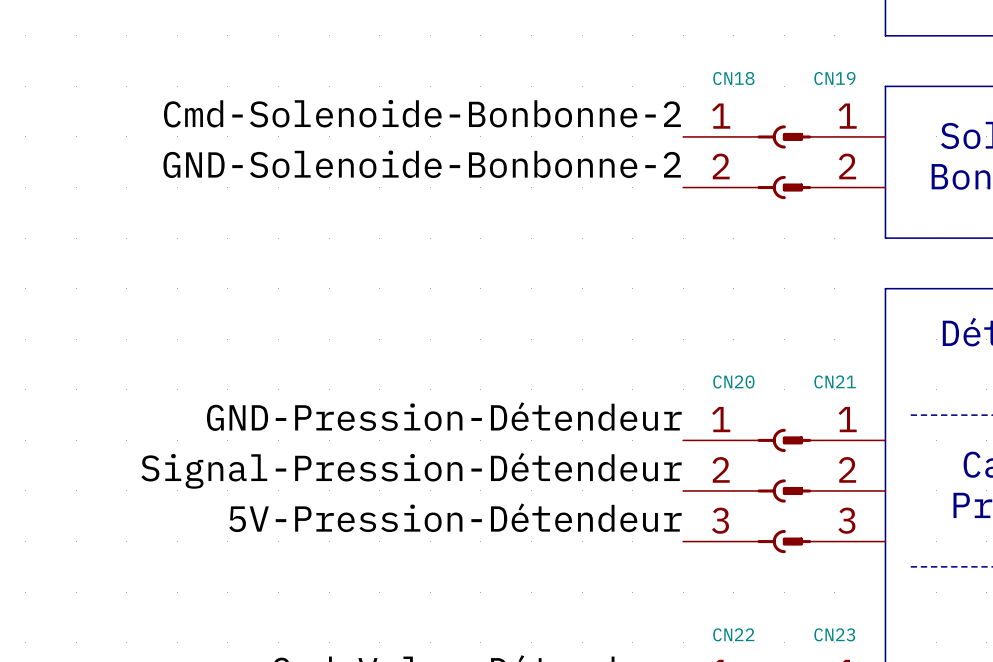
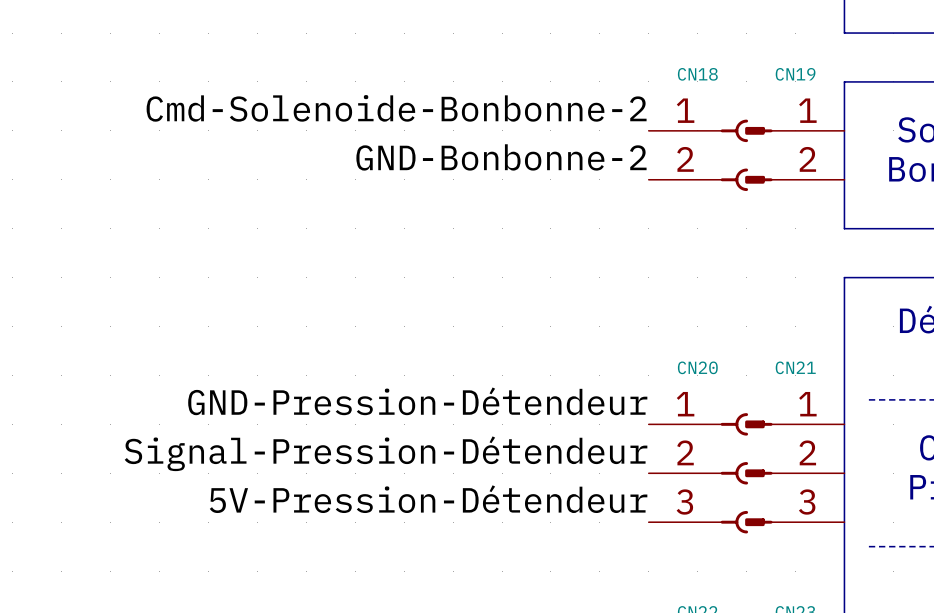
label: GND-Solenoide-Bonbonne-2 (422, 164) -> GND-Bonbonne-2 (501, 157)

